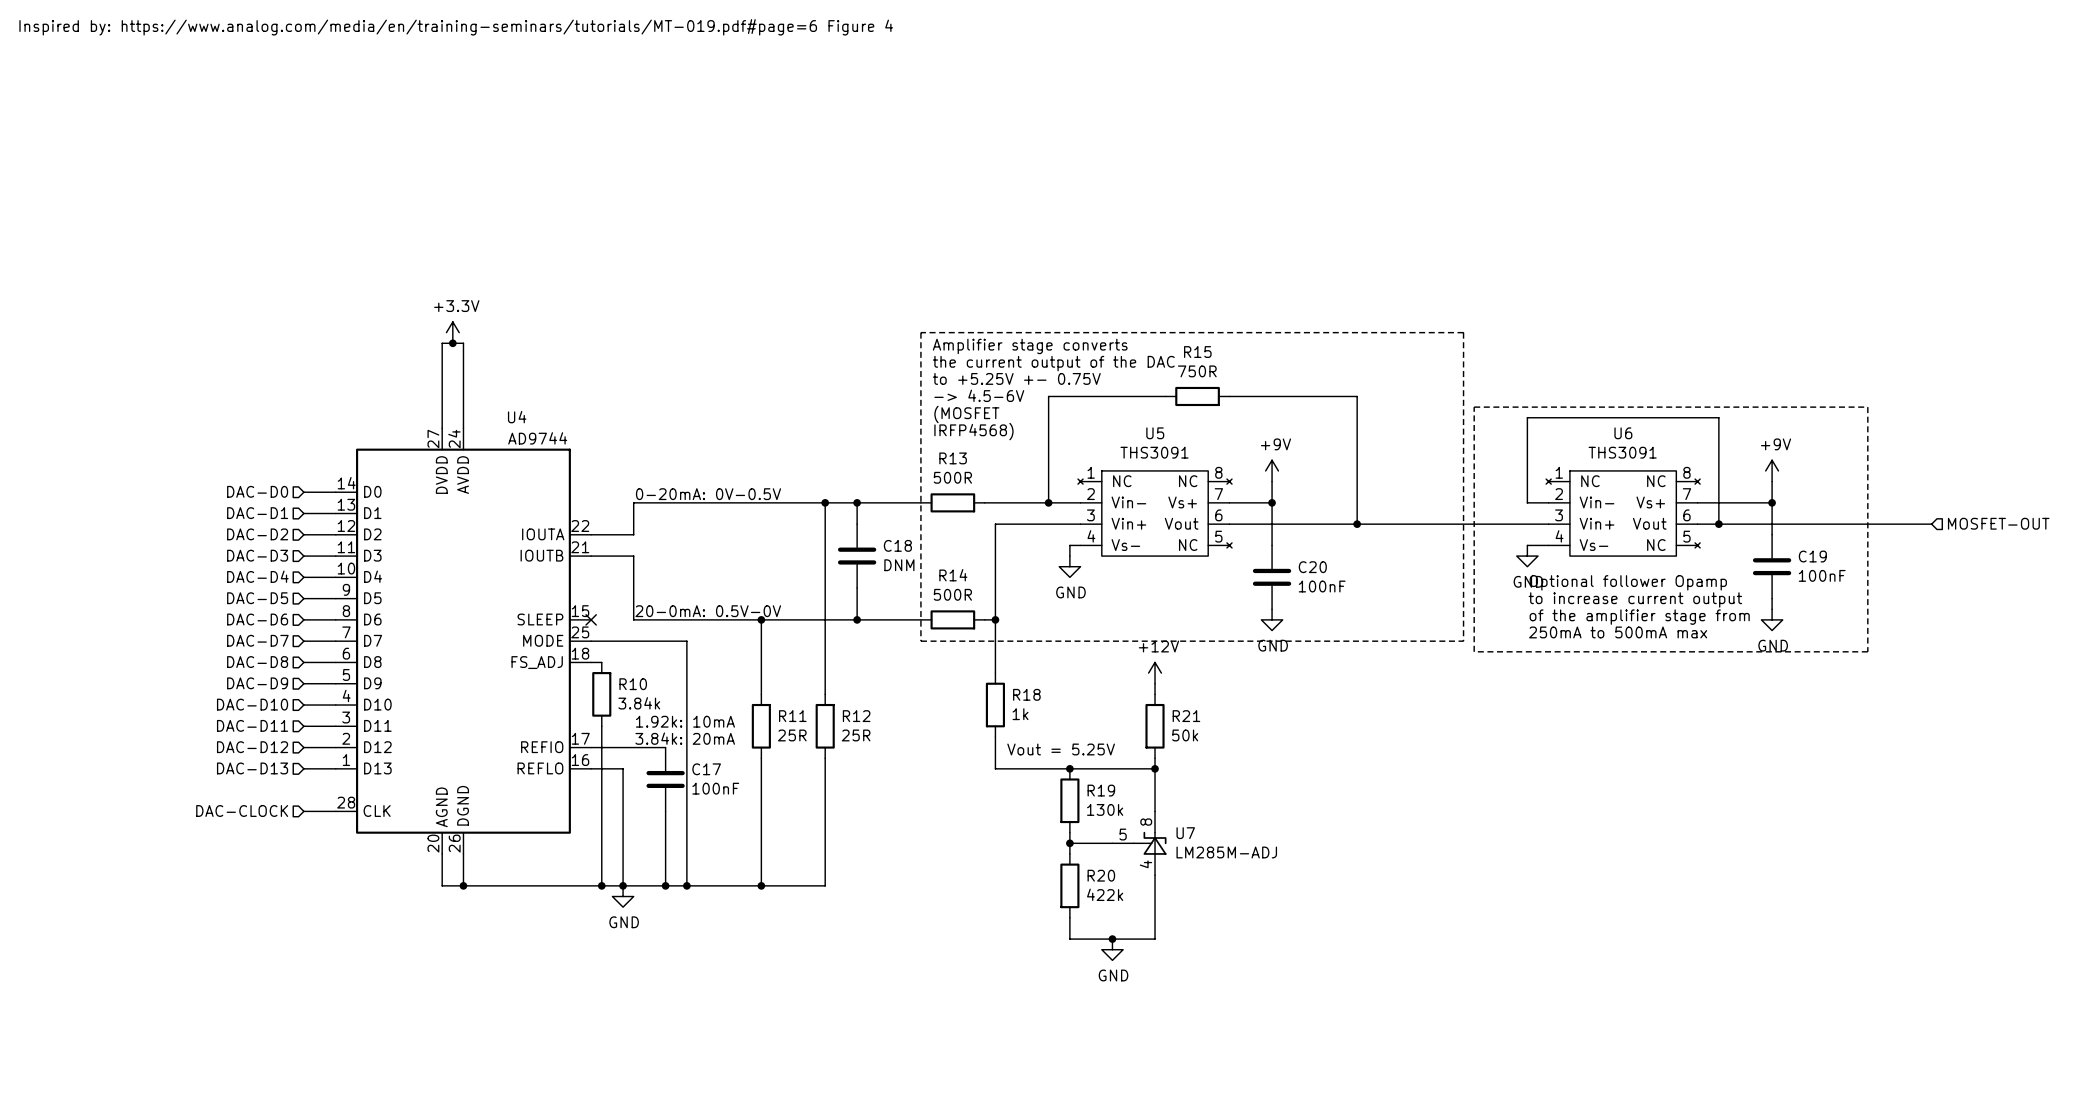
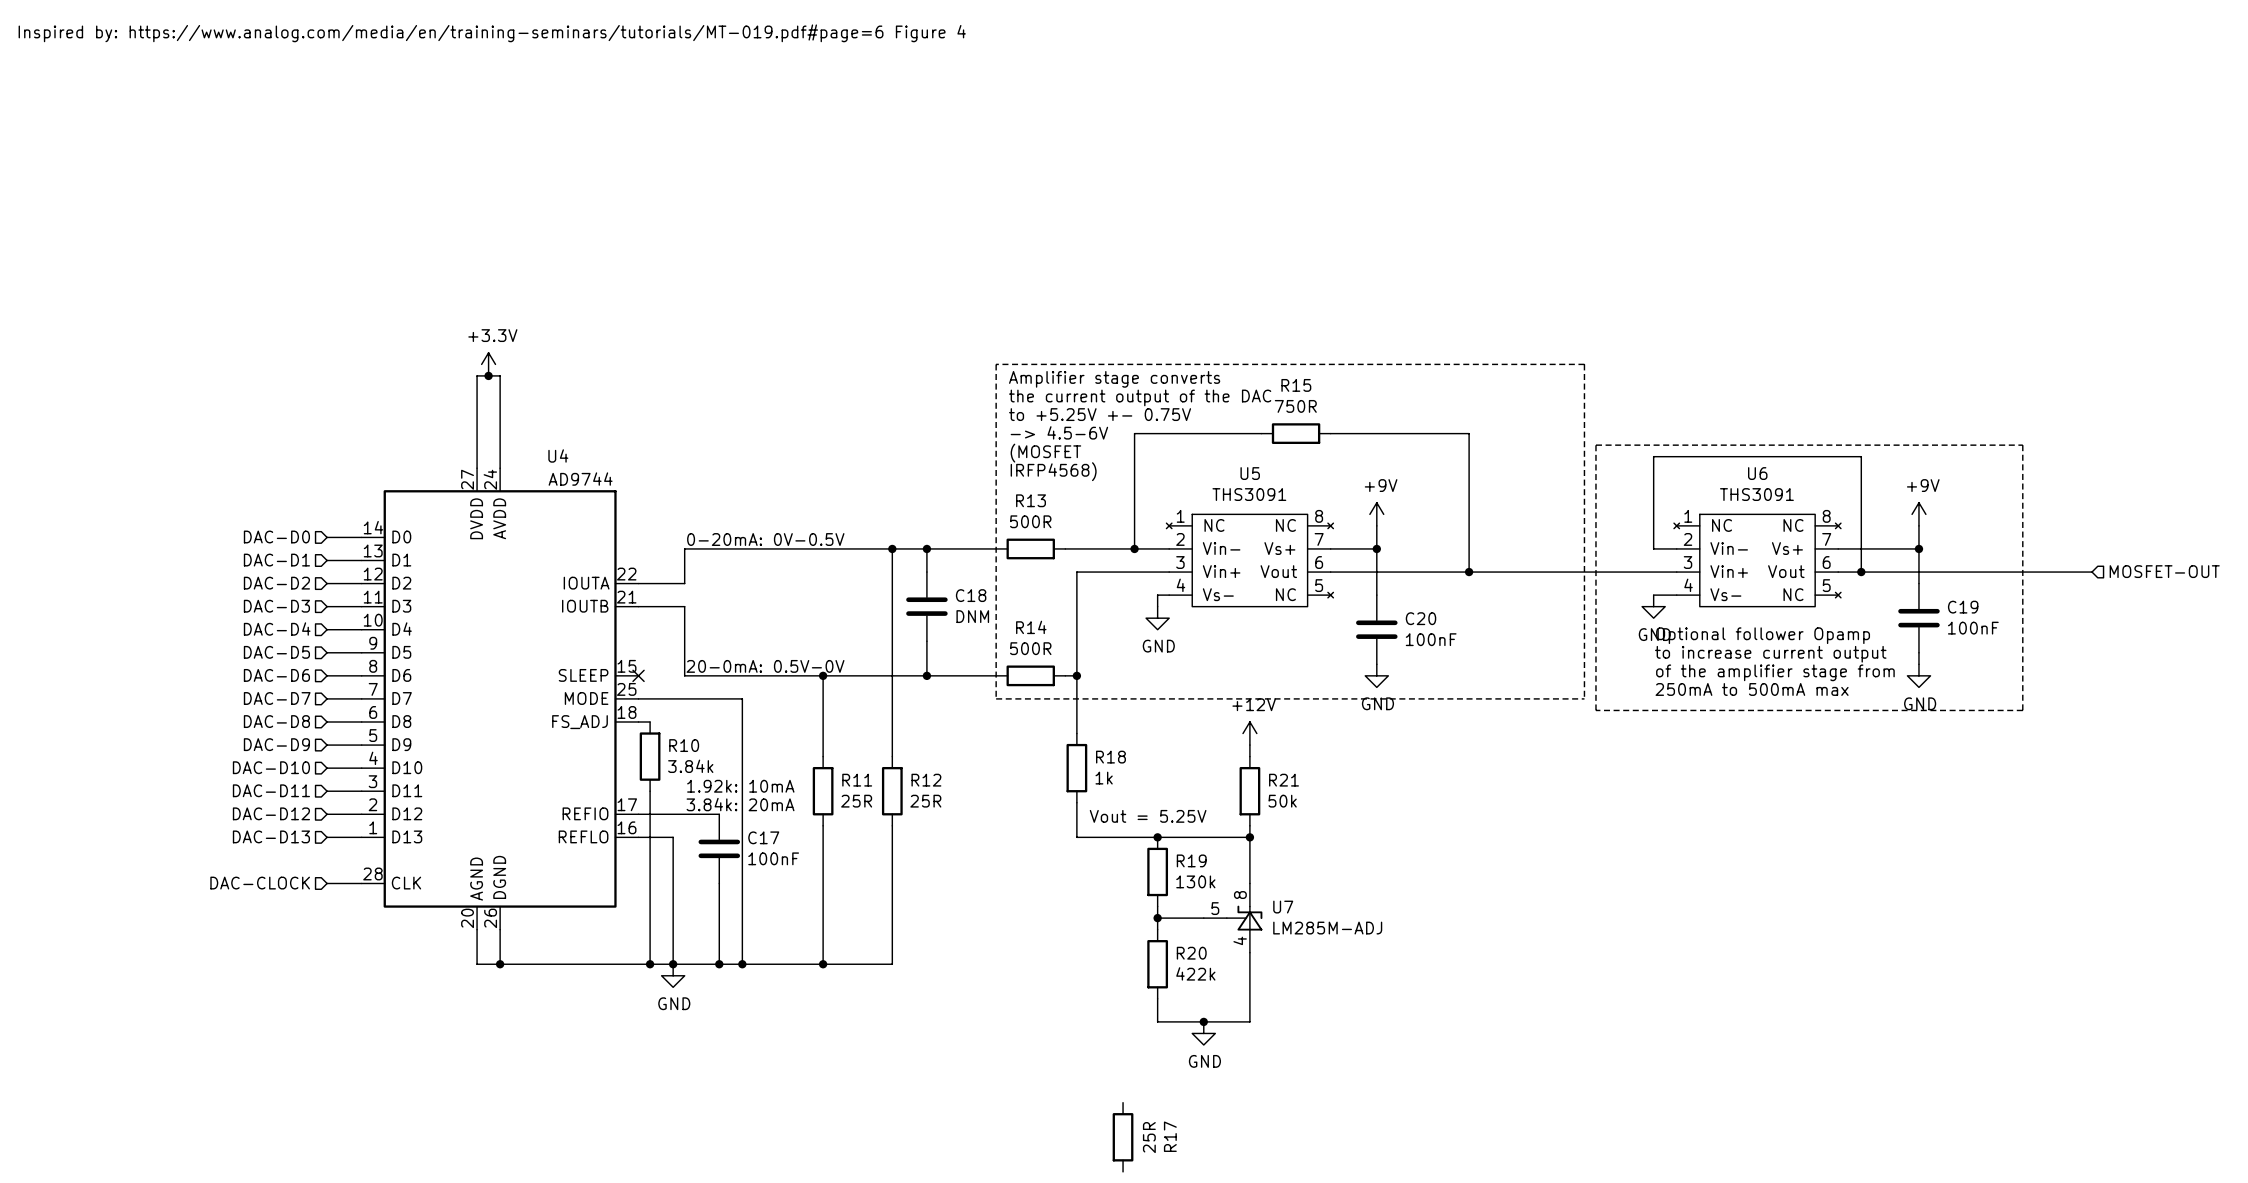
R17: none -> 25R (1123, 1137)

